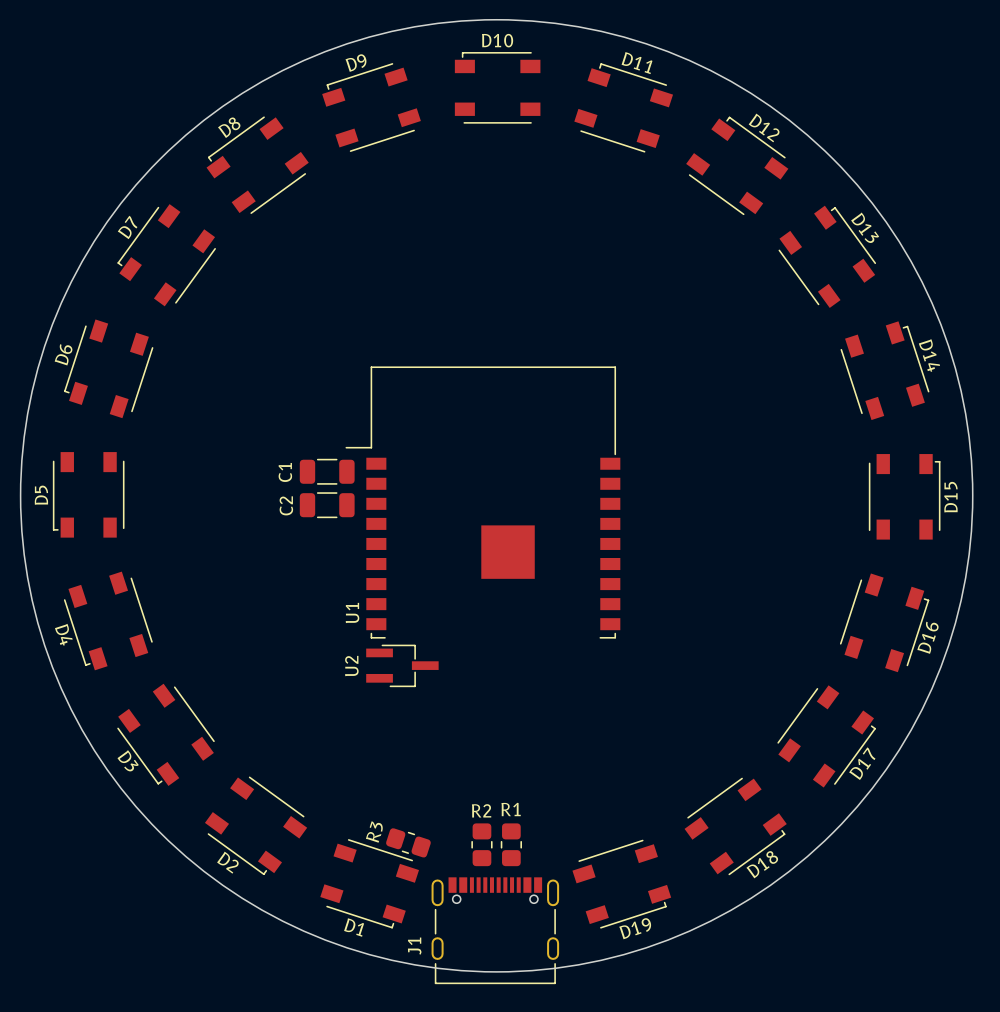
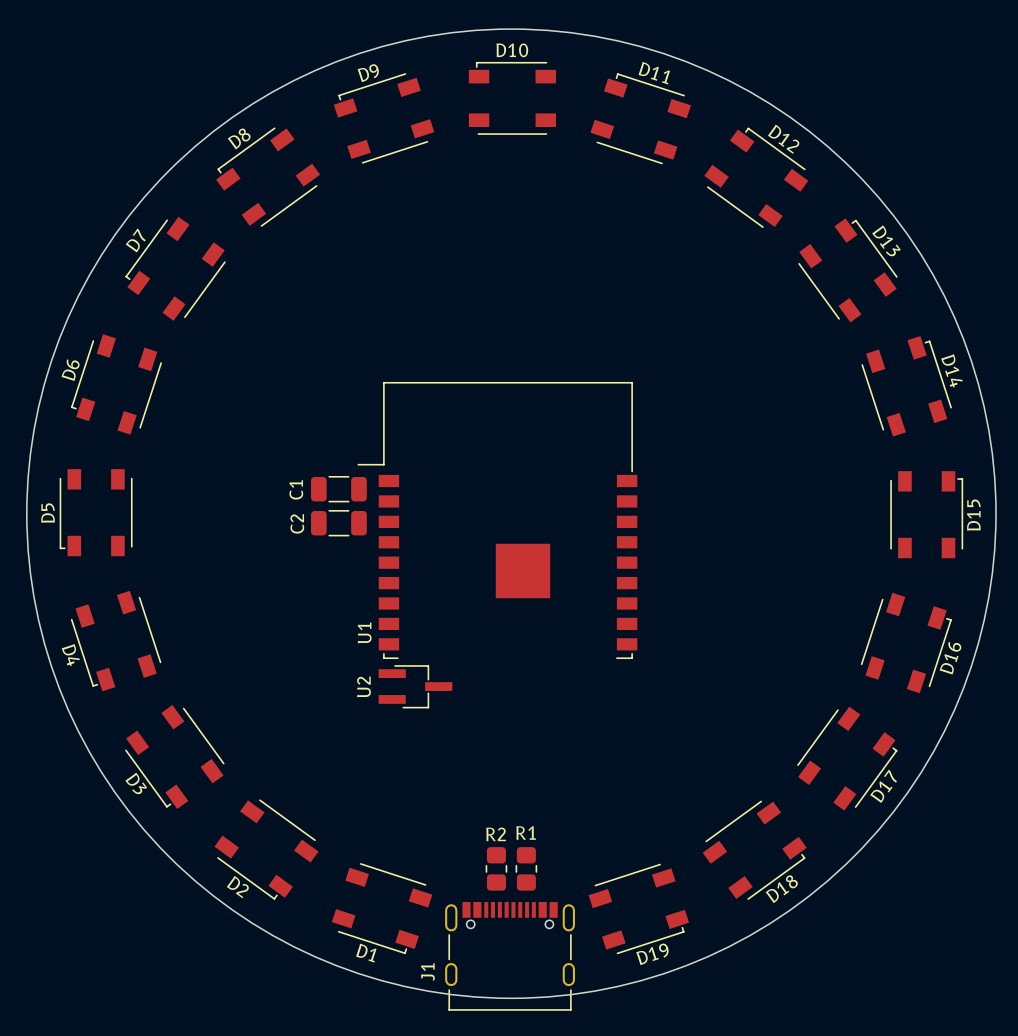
R3: (408, 842) -> none

